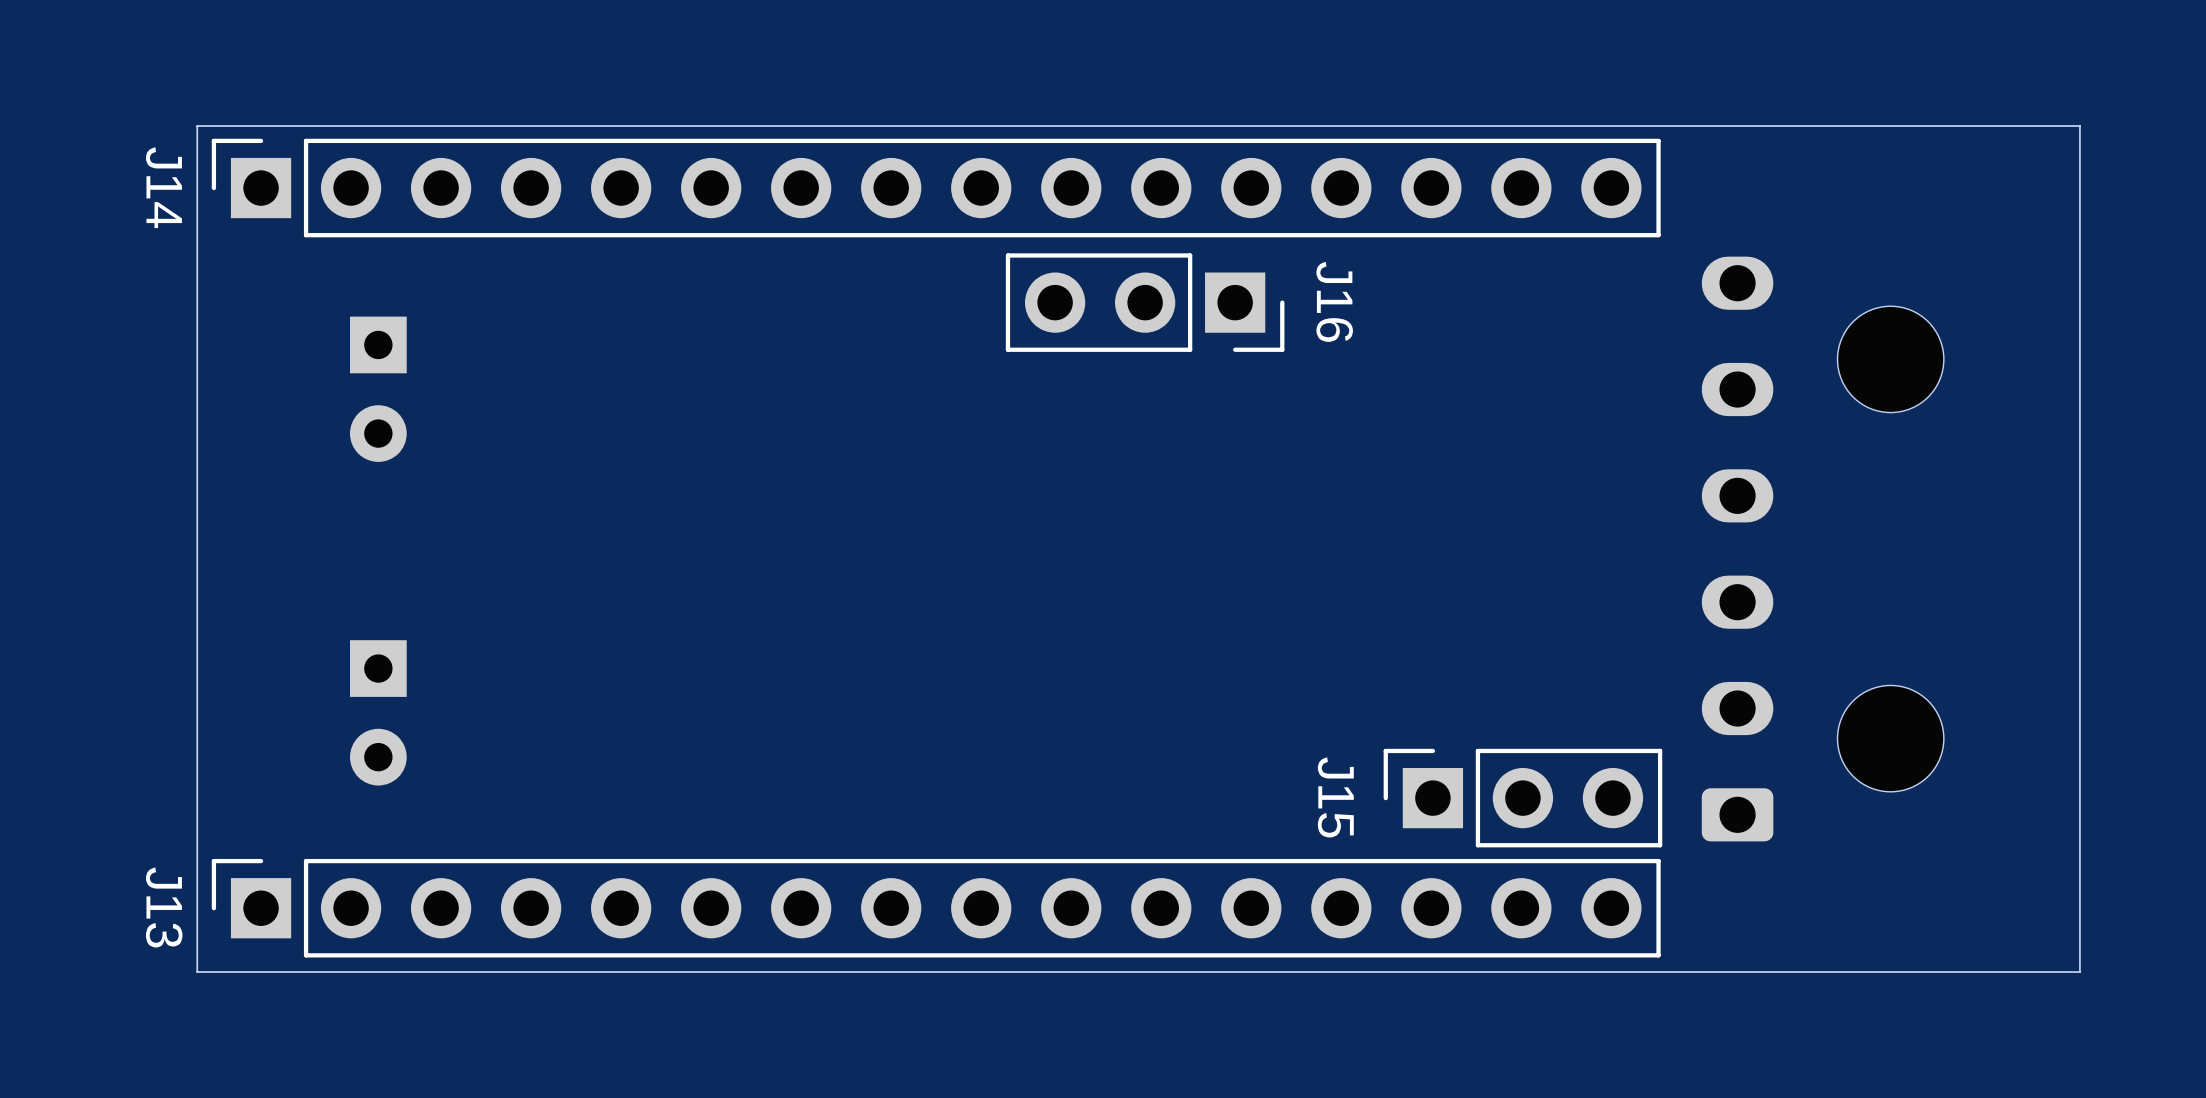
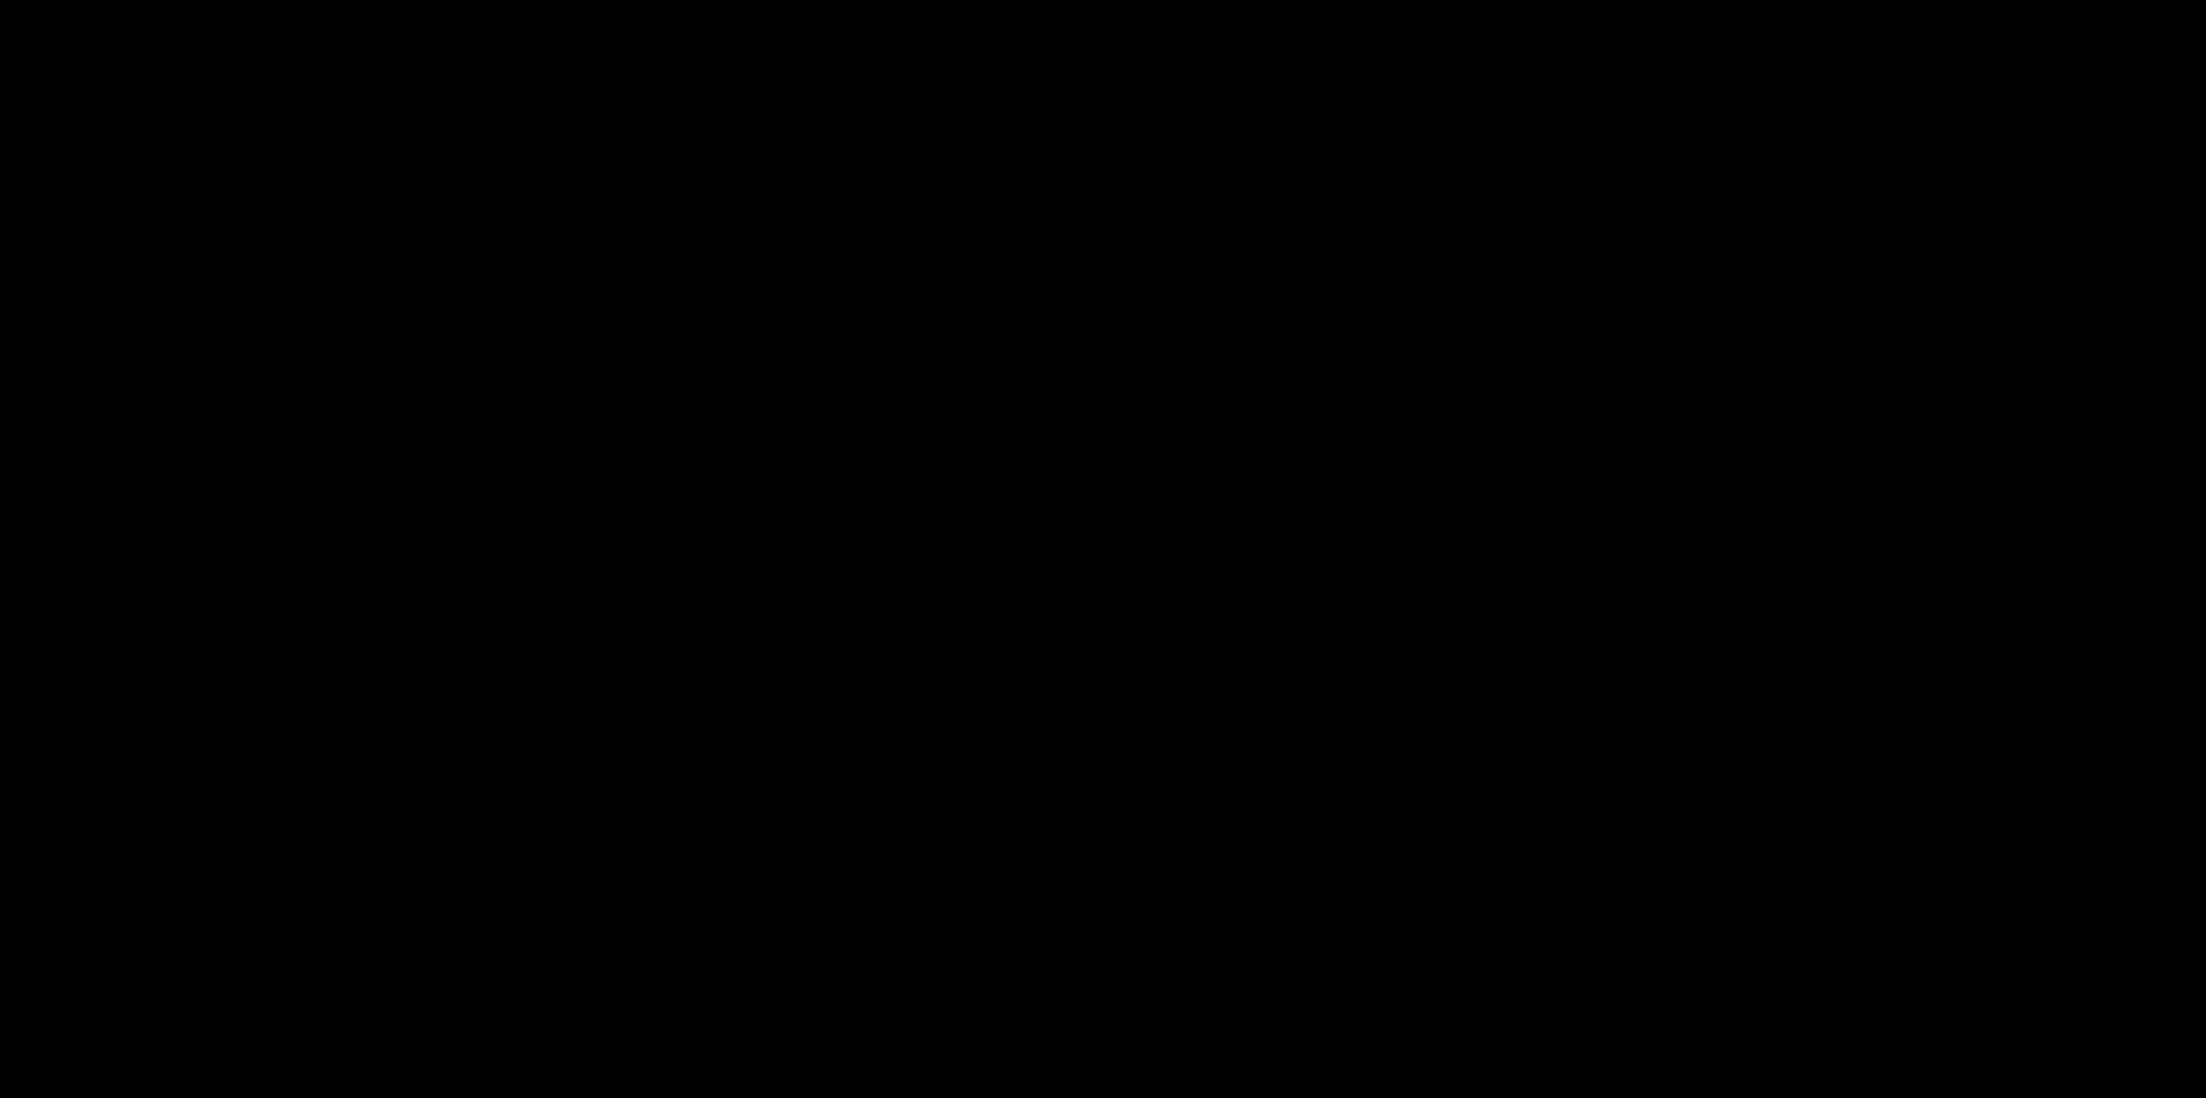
board edge: (2079, 126) (197, 126) (197, 972) (2079, 972) (2079, 126) -> none
J14: (936, 188) -> none
J16: (1145, 302) -> none
part: (378, 389) -> none
part: (1822, 549) -> none
part: (378, 712) -> none
J15: (1522, 798) -> none
J13: (936, 908) -> none

